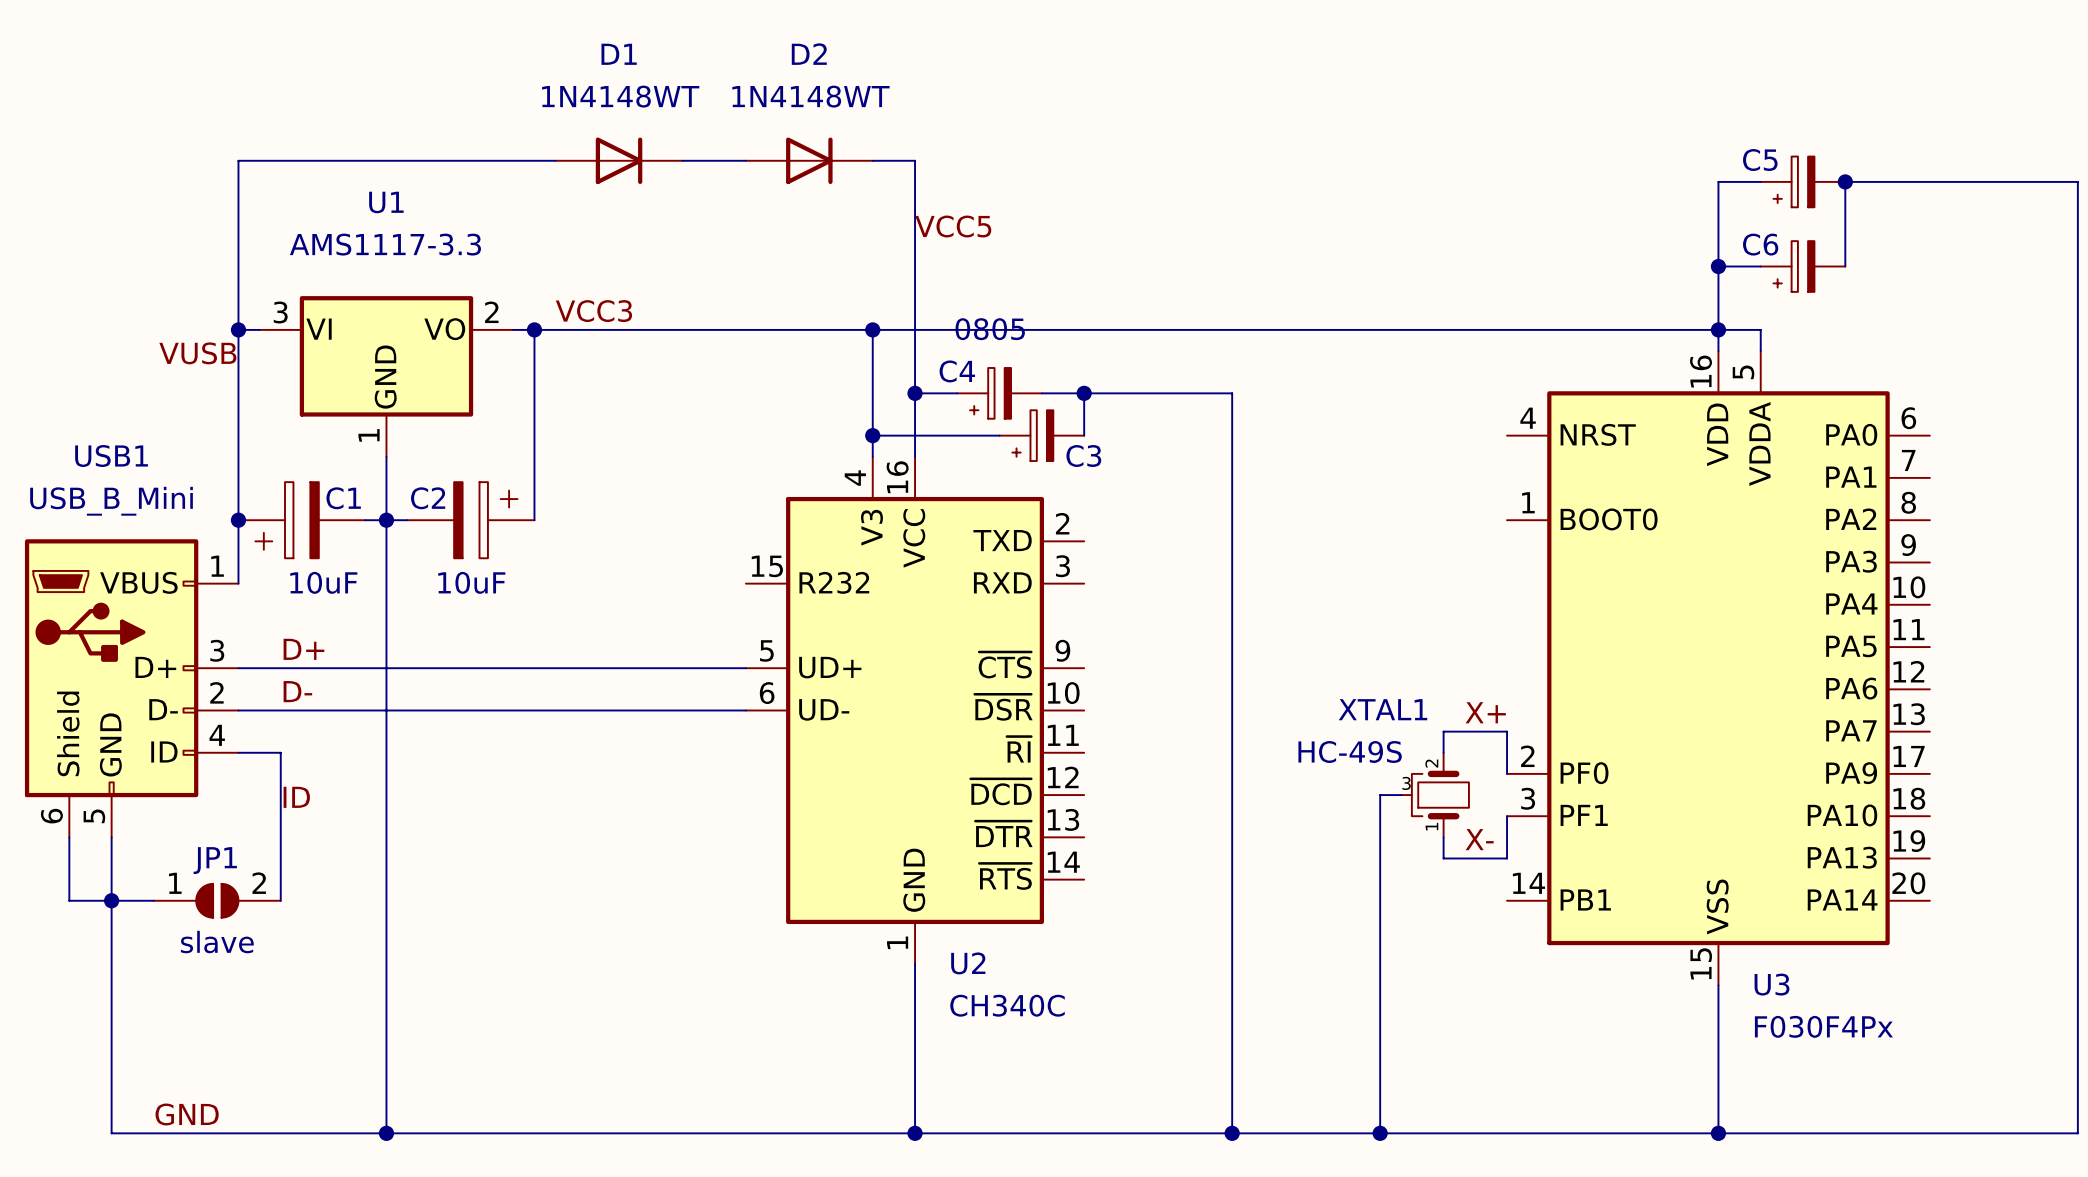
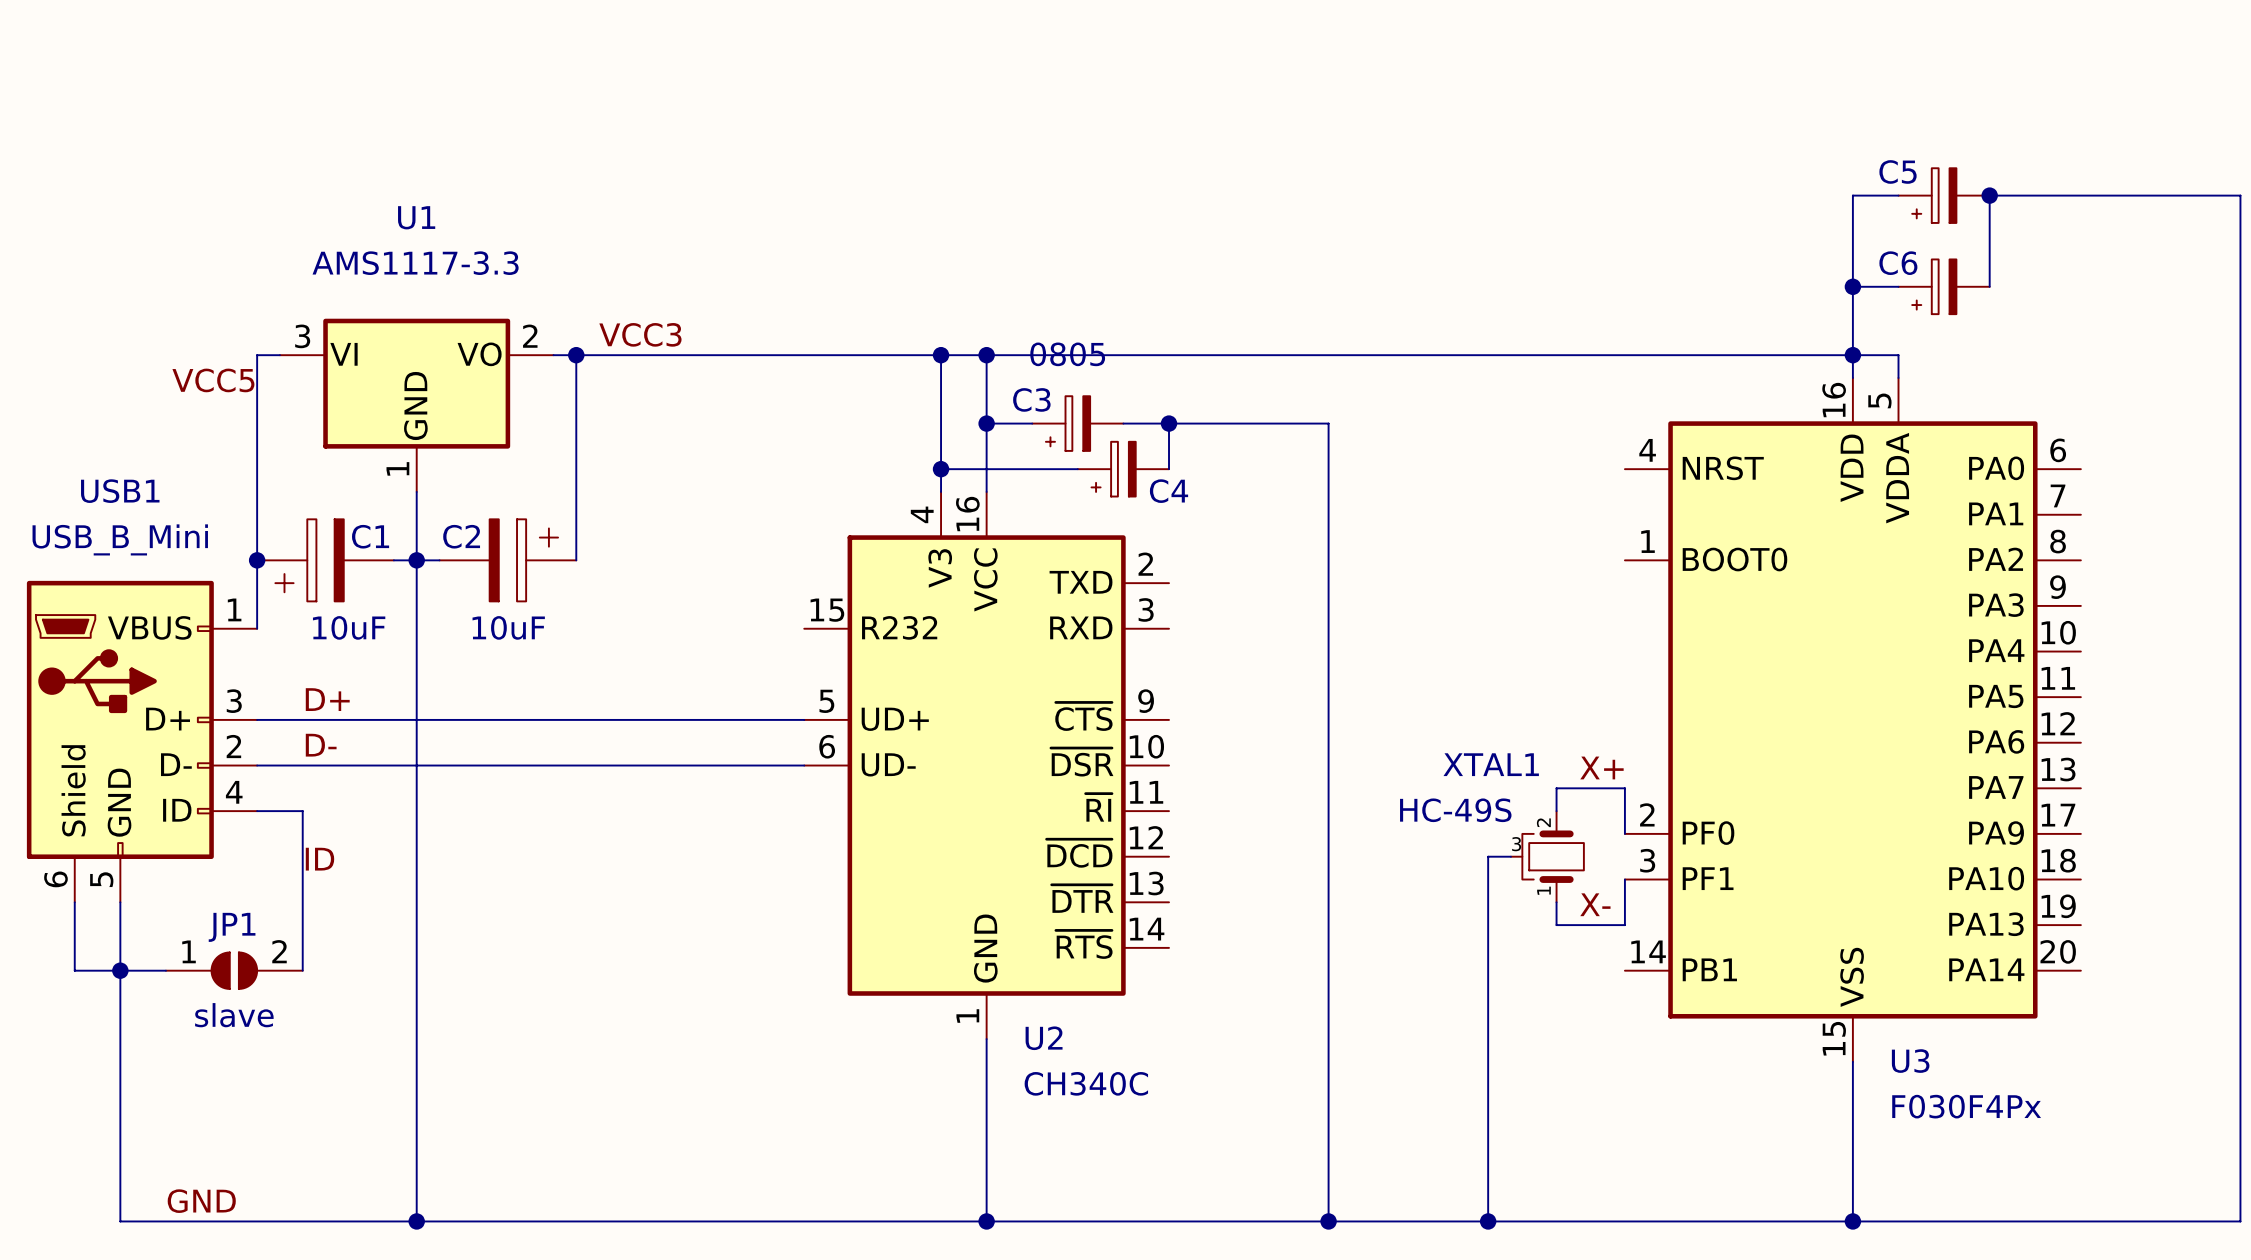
wire: (555, 160) (238, 160) (238, 329) -> none
D1: 1N4148WT (619, 160) -> none
wire: (682, 160) (745, 160) -> none
D2: 1N4148WT (809, 160) -> none
wire: (872, 160) (915, 160) (915, 329) -> none
label: VCC5 (953, 226) -> none
junction: (238, 329) -> none
junction: none -> (986, 355)
label: VUSB (197, 353) -> VCC5 (213, 380)
C4 name: C4 (957, 371) -> C3 (1031, 399)
C3 name: C3 (1083, 456) -> C4 (1169, 491)

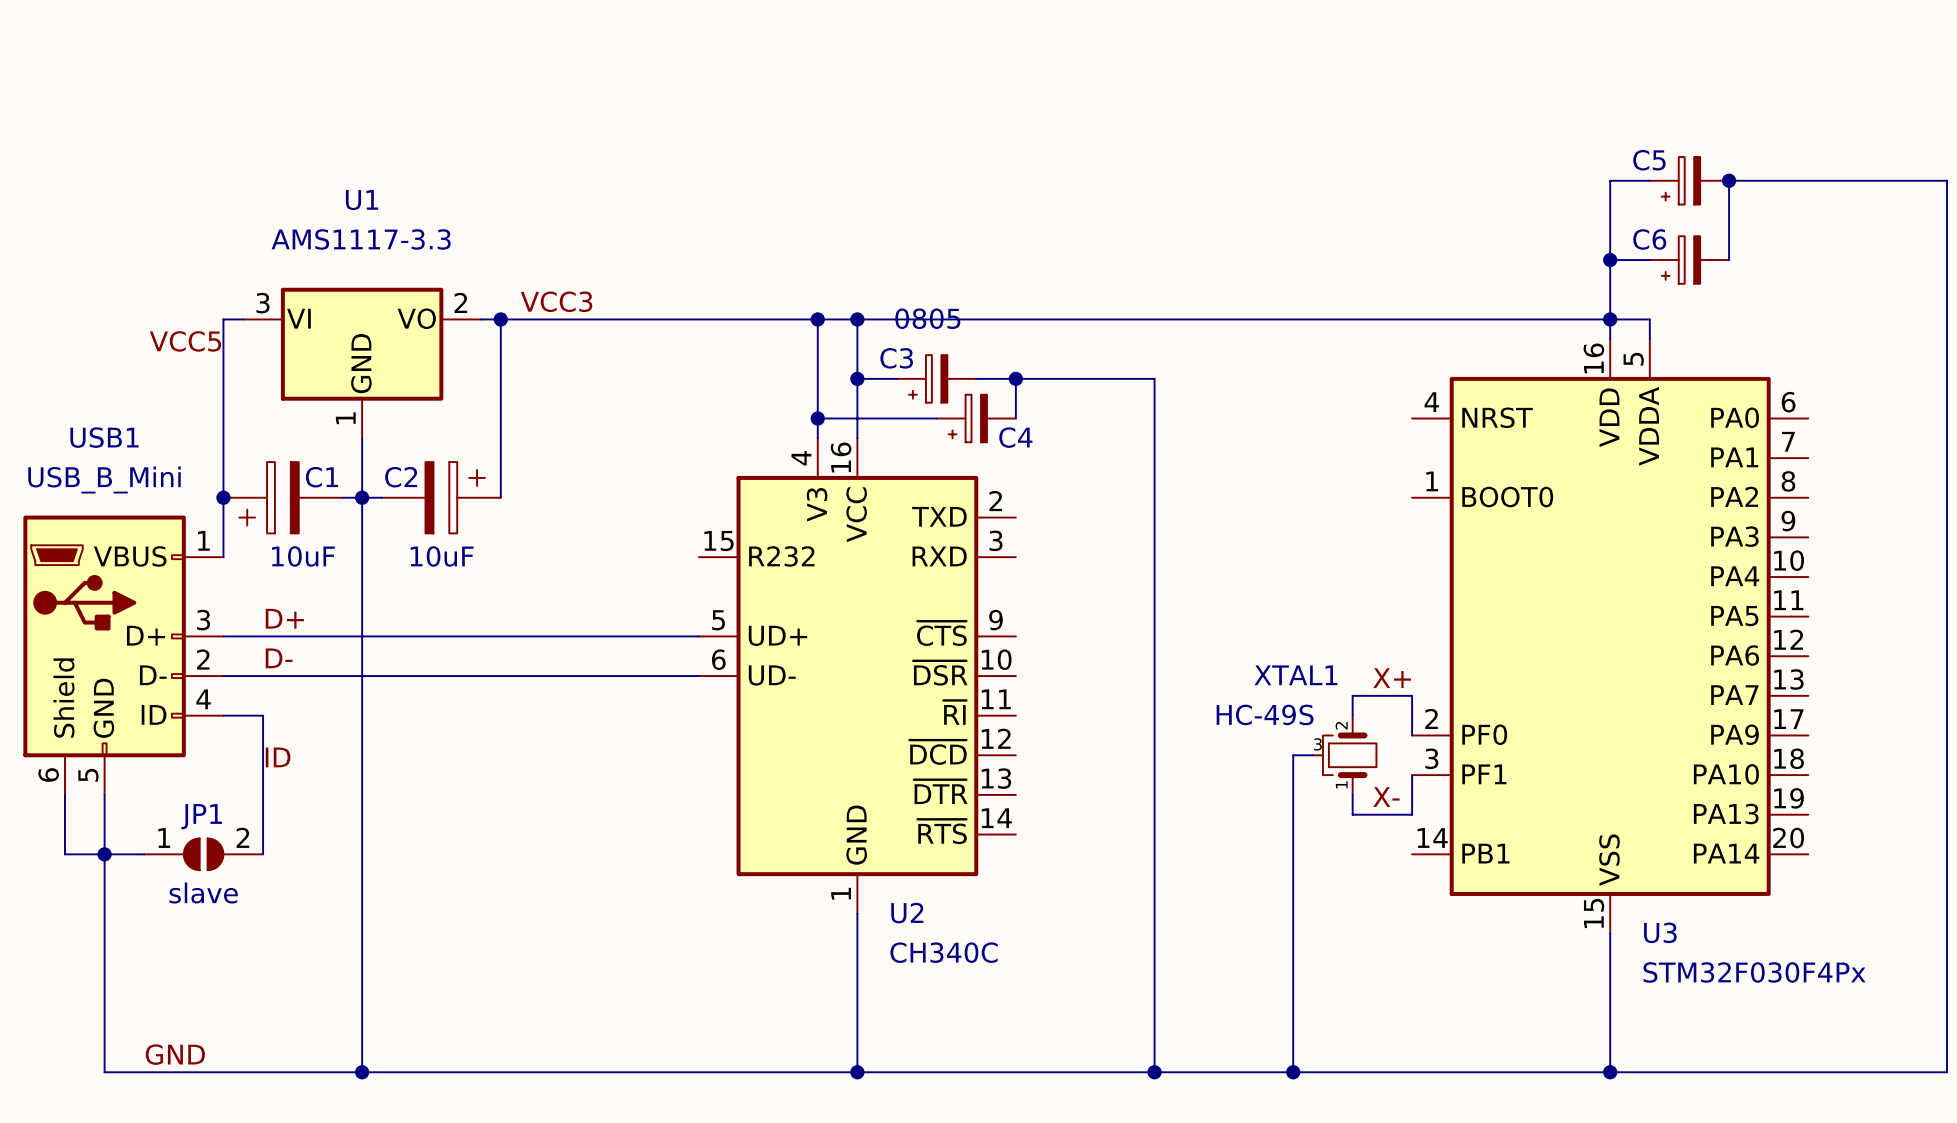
U3 value: F030F4Px (1966, 1106) -> STM32F030F4Px (1754, 972)

